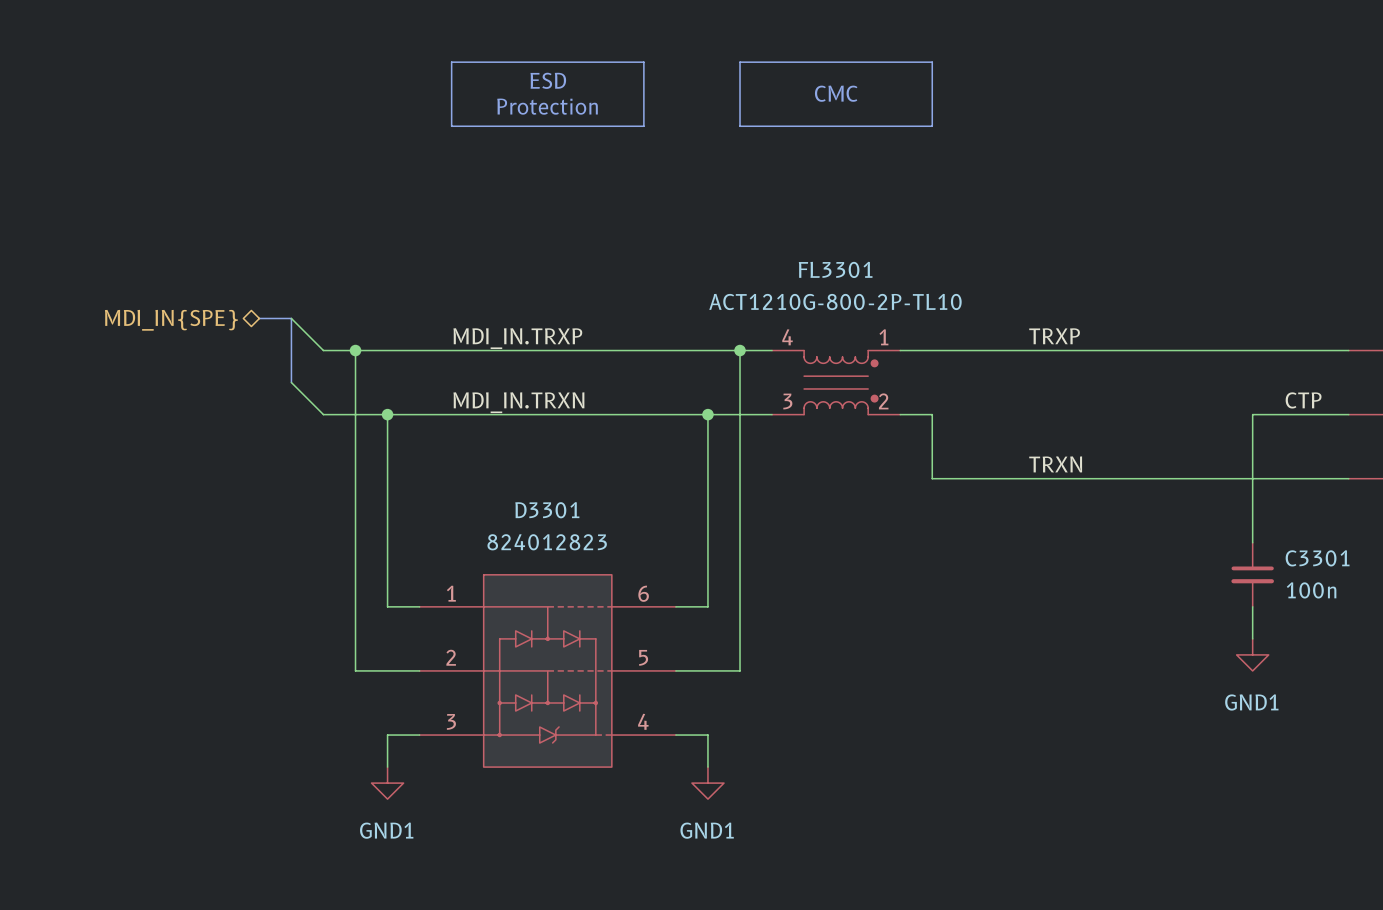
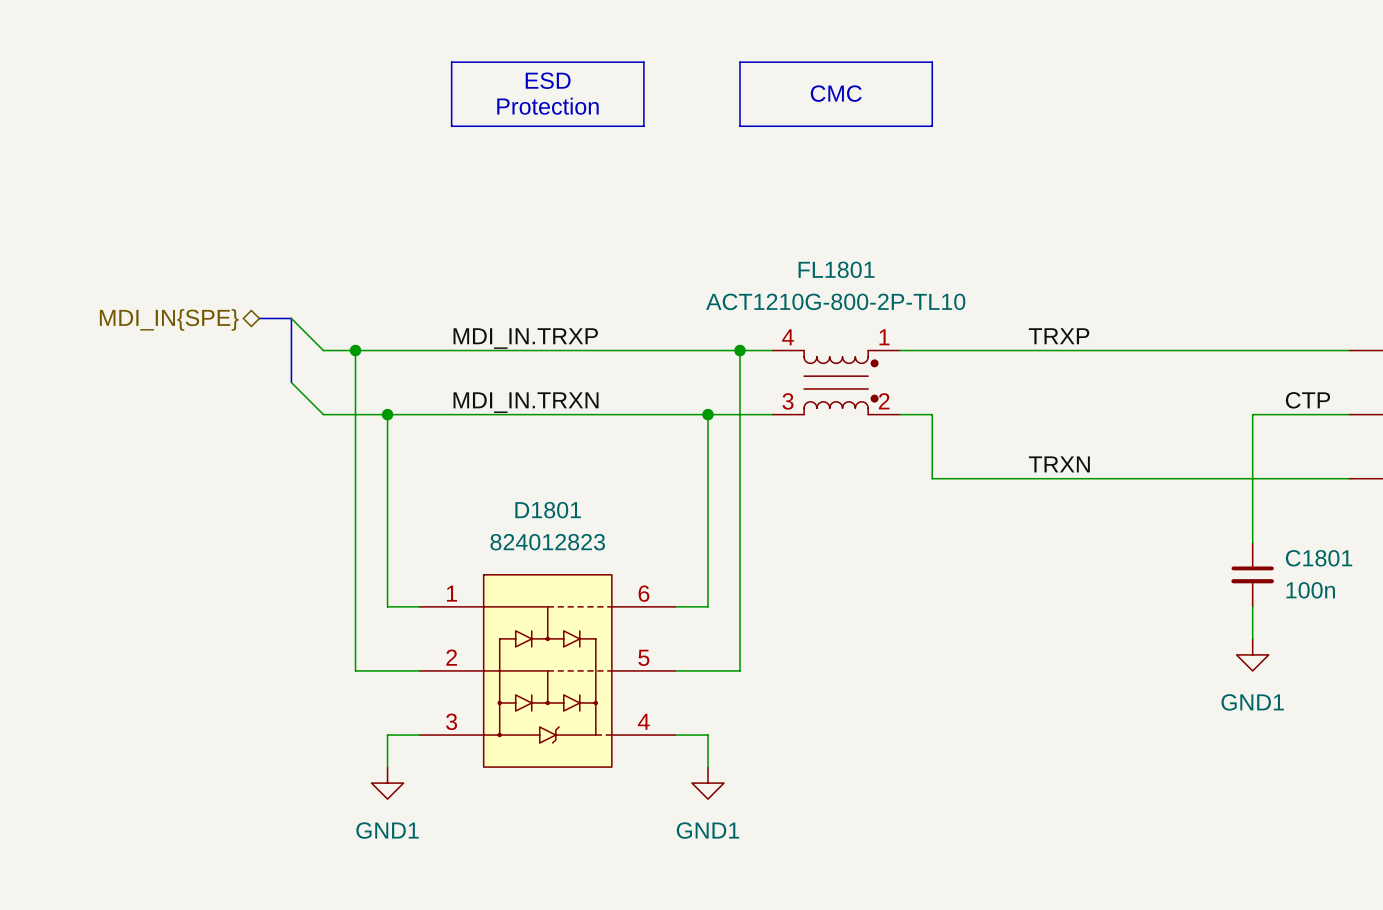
FL3301 name: FL3301 (835, 269) -> FL1801 (836, 269)
D3301 name: D3301 (547, 510) -> D1801 (548, 510)
C3301 name: C3301 (1317, 558) -> C1801 (1319, 558)

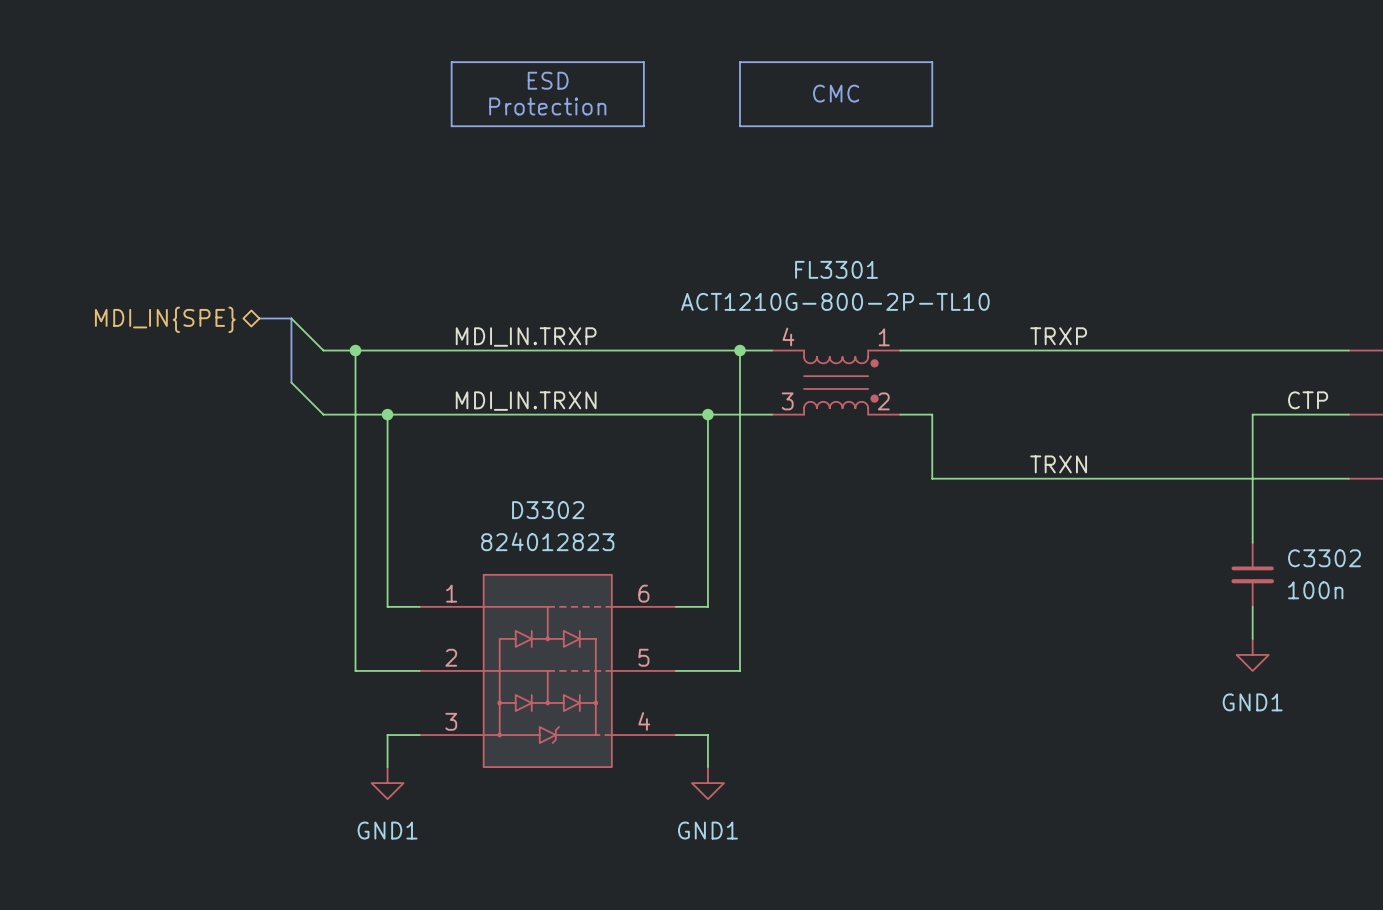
FL1801 name: FL1801 (836, 269) -> FL3301 (836, 269)
D1801 name: D1801 (548, 510) -> D3302 (548, 510)
C1801 name: C1801 (1319, 558) -> C3302 (1324, 558)

